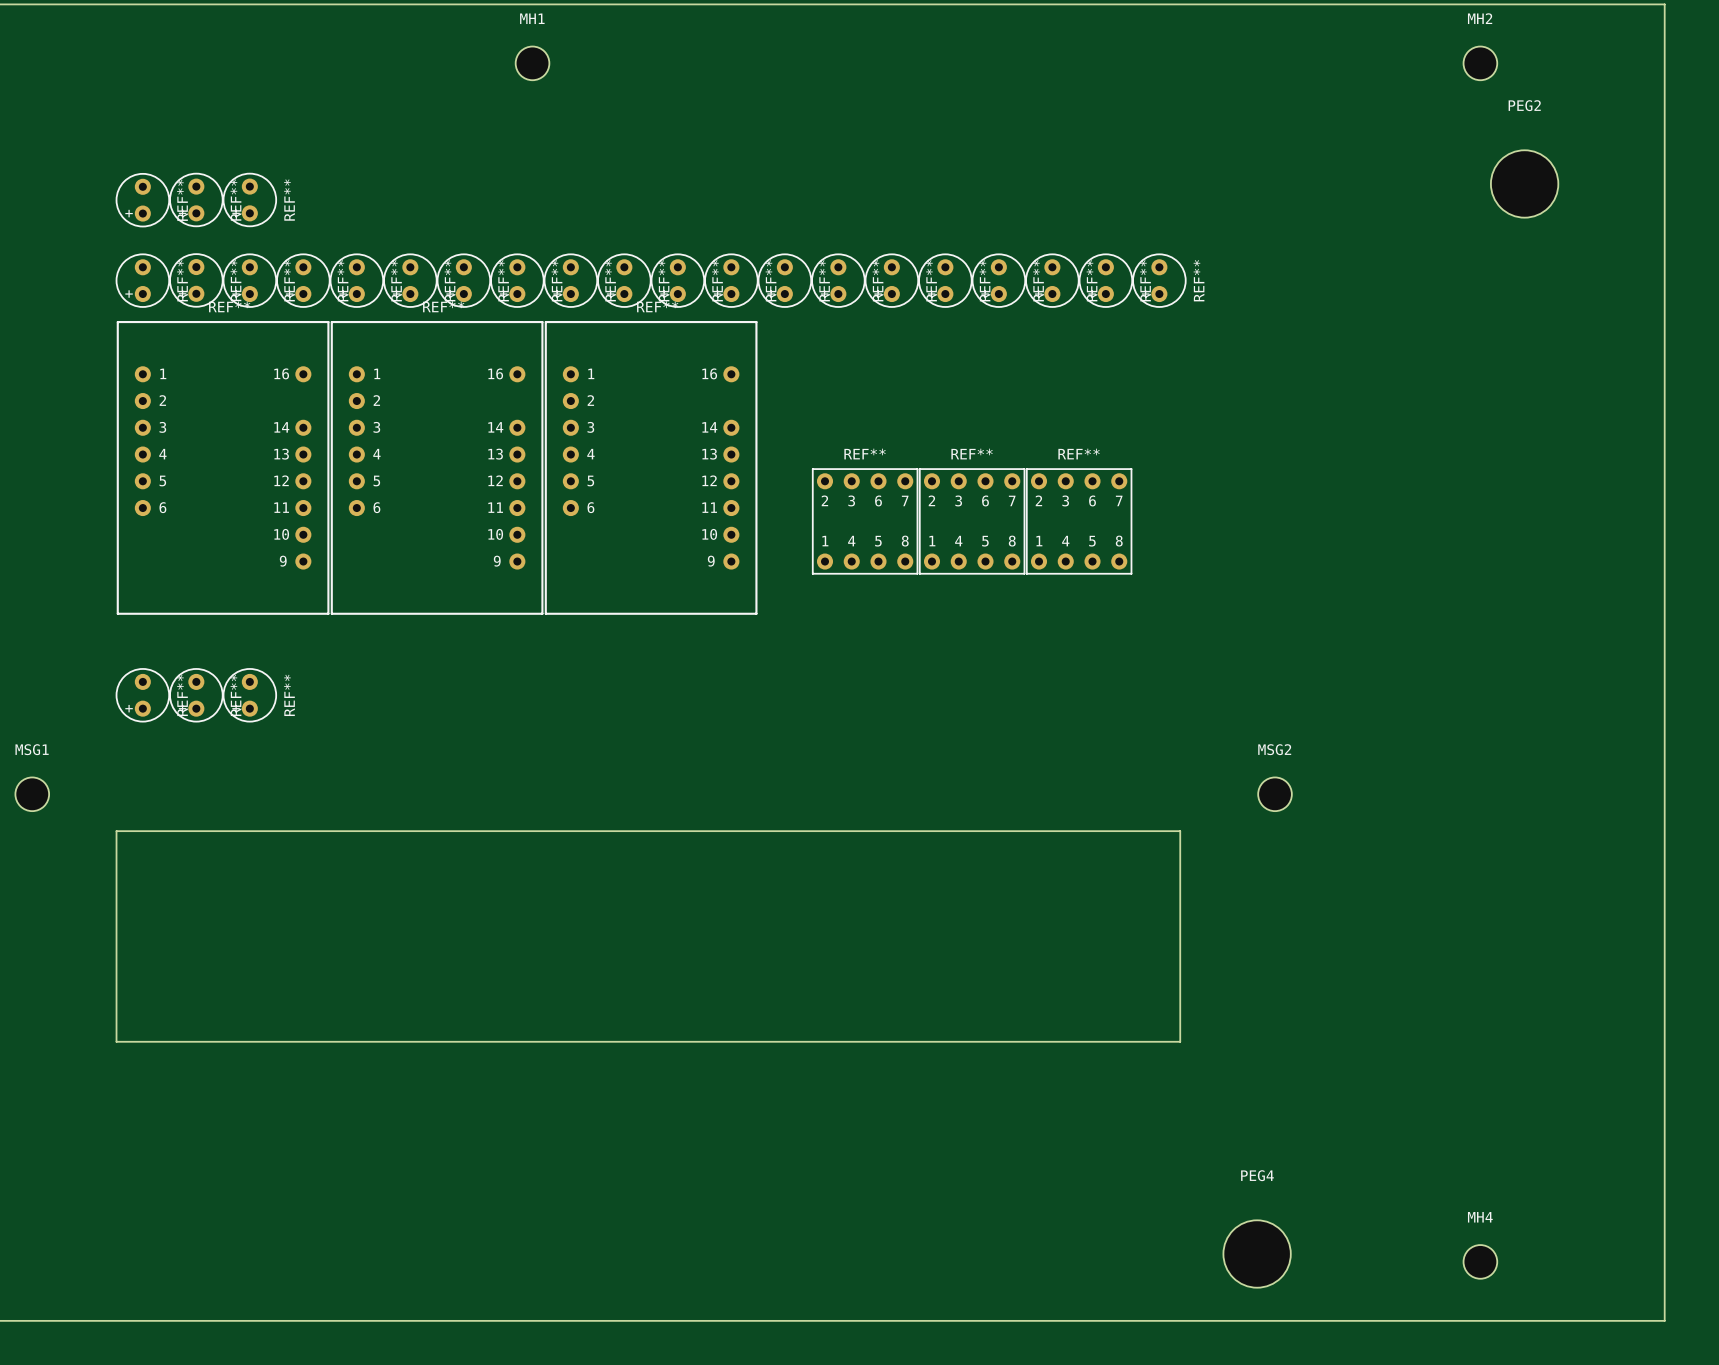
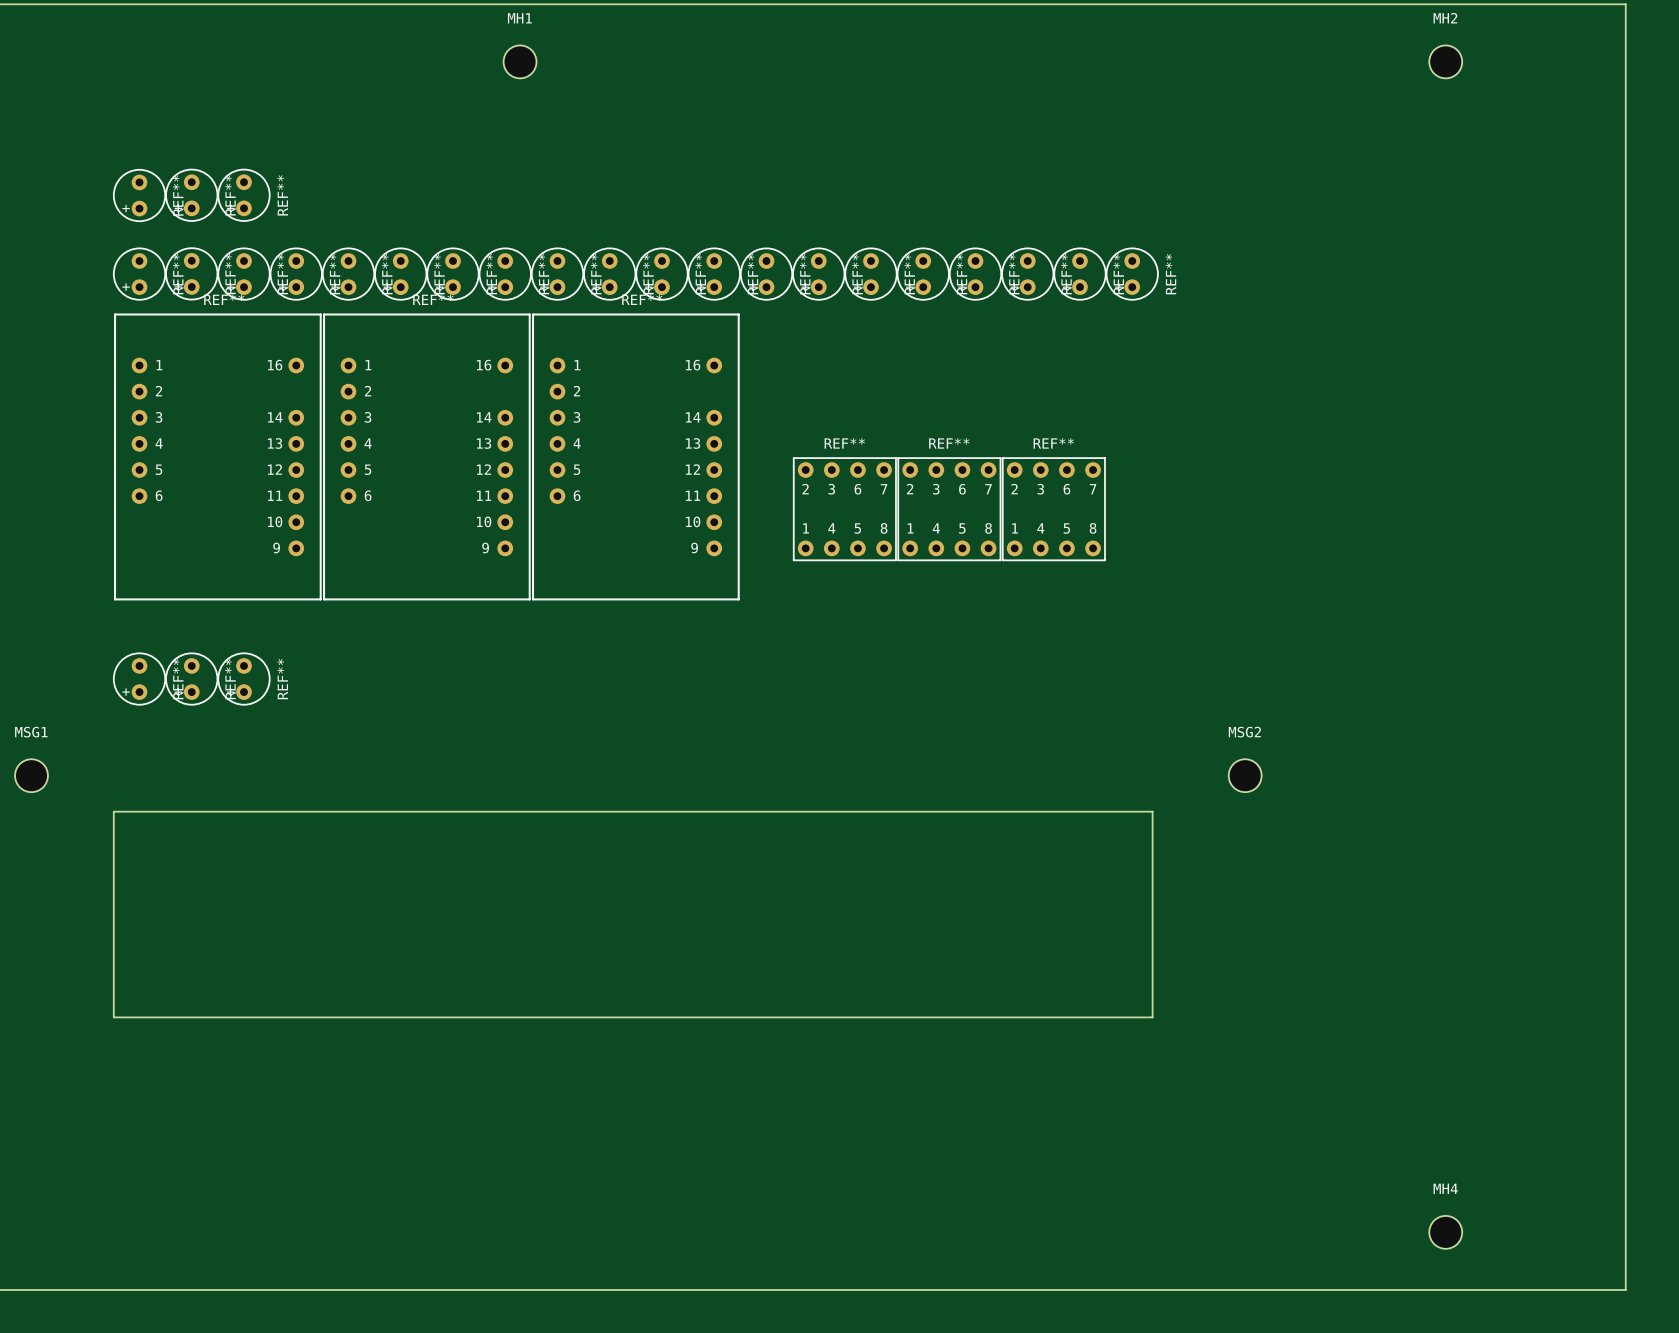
PEG2: (1524, 183) -> none
PEG4: (1257, 1254) -> none

